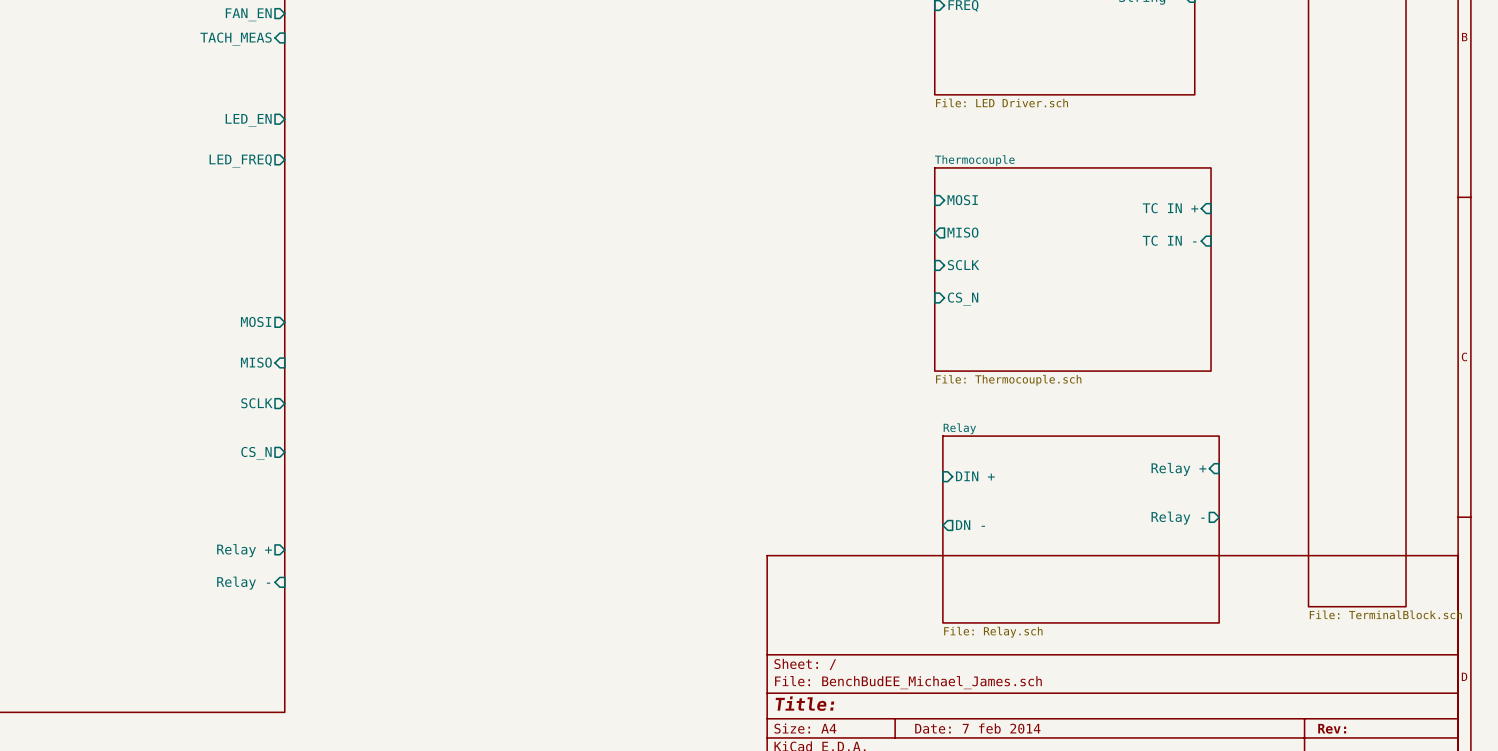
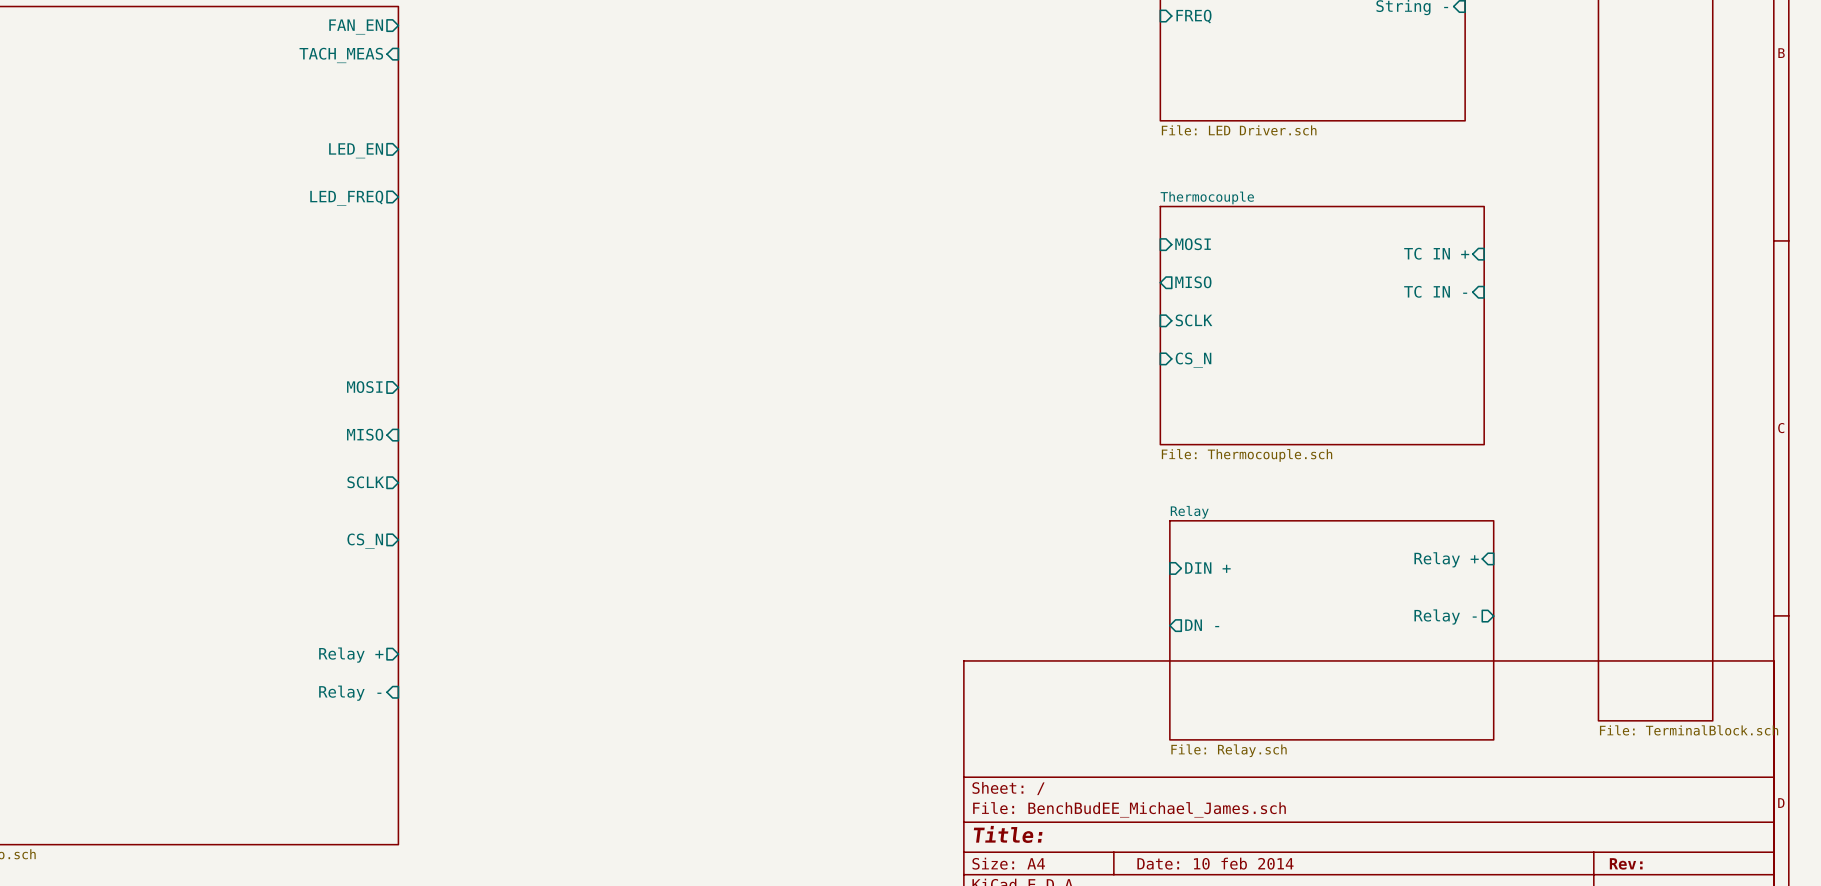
title block: Date: 7 feb 2014 (977, 728) -> Date: 10 feb 2014 (1215, 863)

